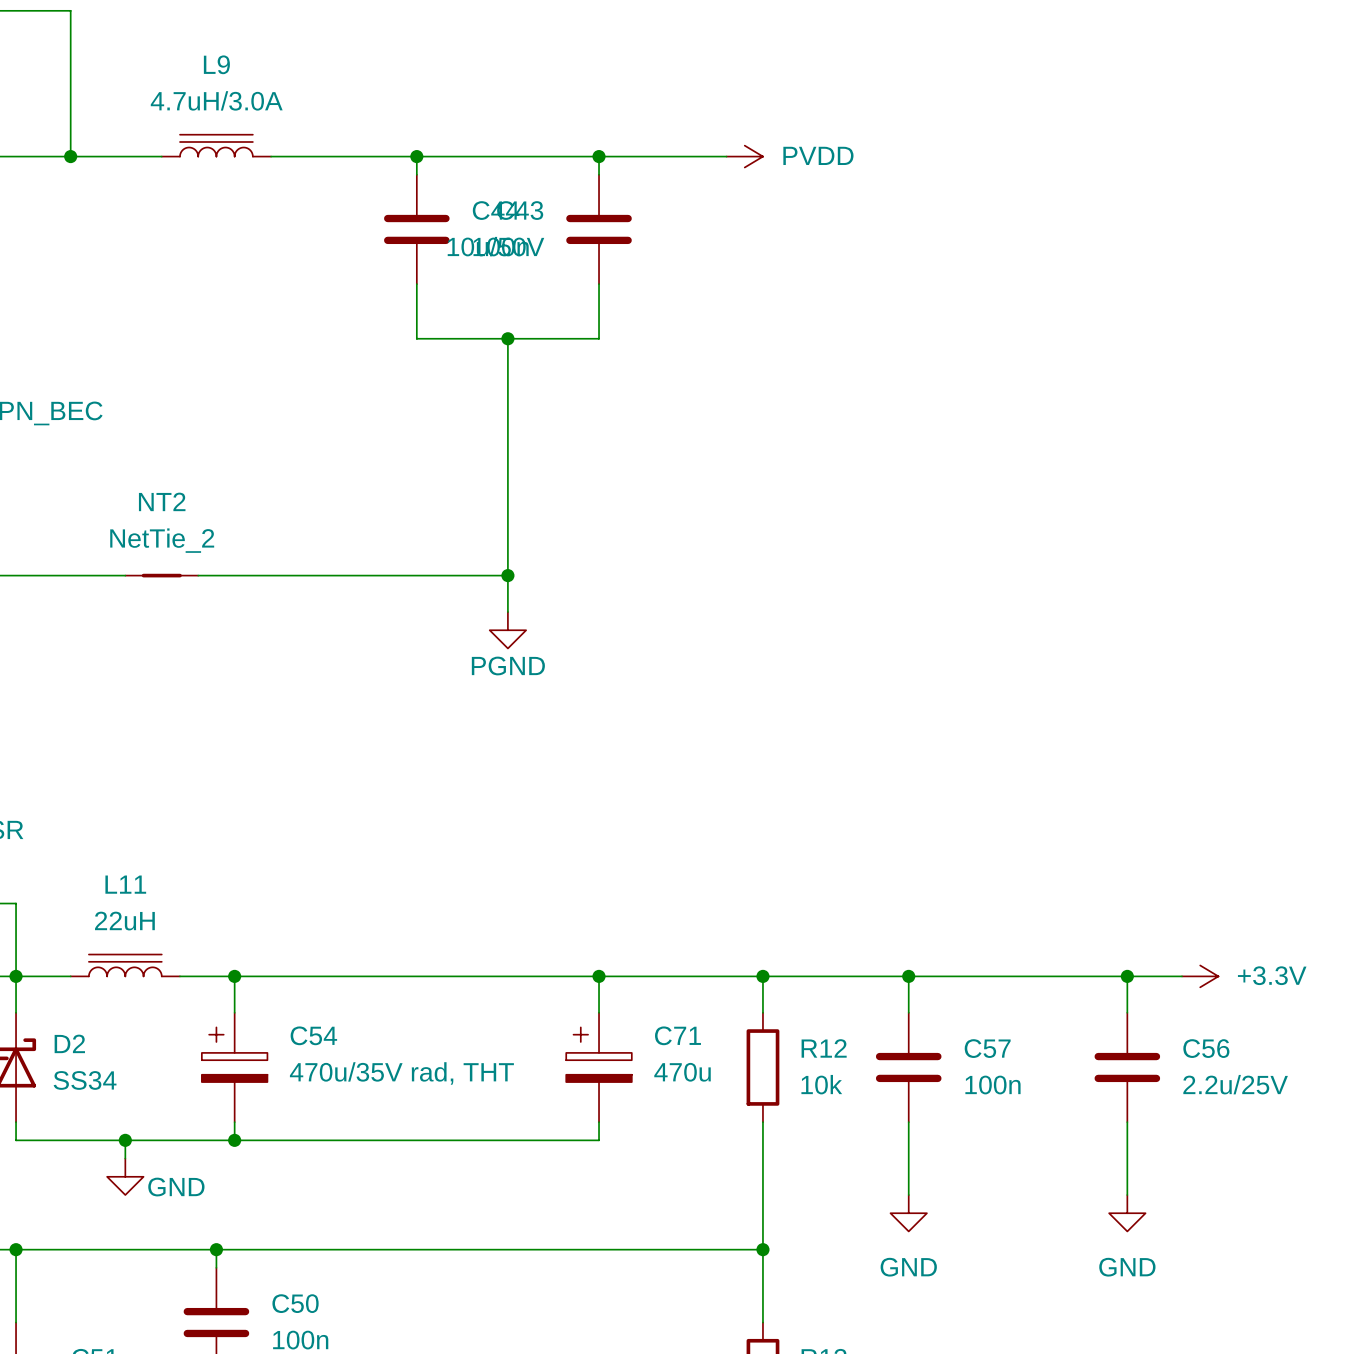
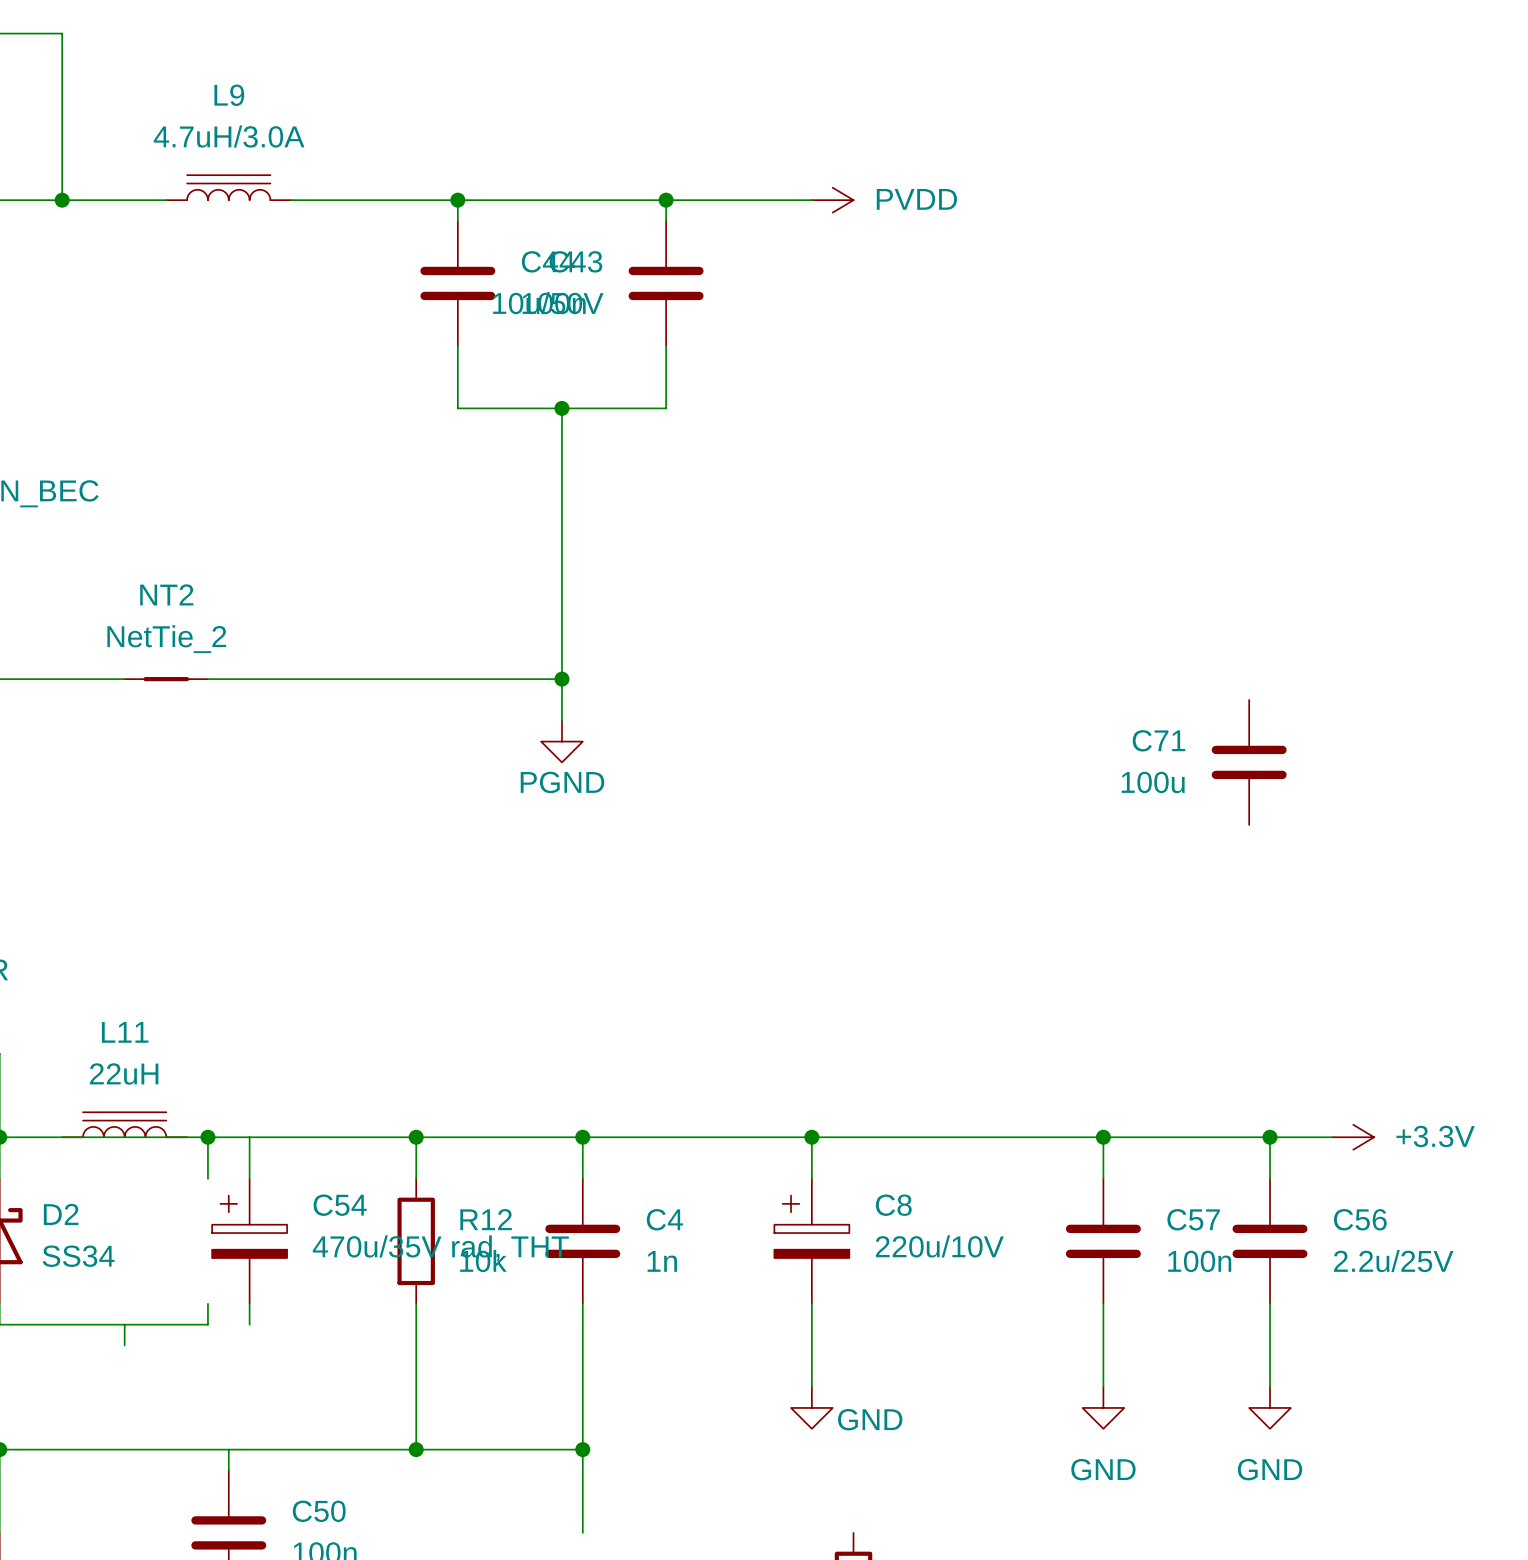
wire: none -> (62, 1137) (187, 1137)
wire: none -> (207, 1137) (207, 1178)
junction position: (234, 976) -> (207, 1137)
wire: none -> (416, 1137) (416, 1178)
junction: none -> (416, 1137)
junction: none -> (582, 1137)
wire: (599, 976) (599, 1012) -> (811, 1137) (811, 1178)
junction: (599, 976) -> none
wire: (762, 976) (762, 1012) -> (582, 1137) (582, 1178)
junction position: (762, 976) -> (811, 1137)
wire: (908, 976) (908, 1012) -> (1103, 1137) (1103, 1178)
junction position: (908, 976) -> (1103, 1137)
C71 symbol: [566, 1012, 632, 1123] -> [1211, 699, 1287, 825]
C71 name position: C71 (677, 1035) -> C71 (1158, 740)
C4: none -> 1n (582, 1241)
C8: none -> 220u/10V (811, 1241)
R12 position: (762, 1067) -> (416, 1241)
C57 position: (908, 1067) -> (1103, 1241)
C71 value: 470u (682, 1072) -> 100u (1153, 782)
wire: none -> (416, 1303) (416, 1449)
wire: (599, 1122) (599, 1140) (198, 1140) -> (207, 1303) (207, 1324)
wire: none -> (811, 1303) (811, 1387)
wire: (762, 1122) (762, 1322) -> (582, 1303) (582, 1532)
wire: (908, 1122) (908, 1195) -> (1103, 1303) (1103, 1387)
junction: (125, 1140) -> none
junction: (234, 1140) -> none
power symbol: GND (125, 1176) -> none
power symbol: none -> GND (811, 1407)
power symbol position: GND (908, 1213) -> GND (1103, 1407)
junction: (216, 1249) -> none
junction: none -> (416, 1449)
wire: (526, 1249) (762, 1249) -> none
junction: none -> (582, 1449)
junction: (762, 1249) -> none

